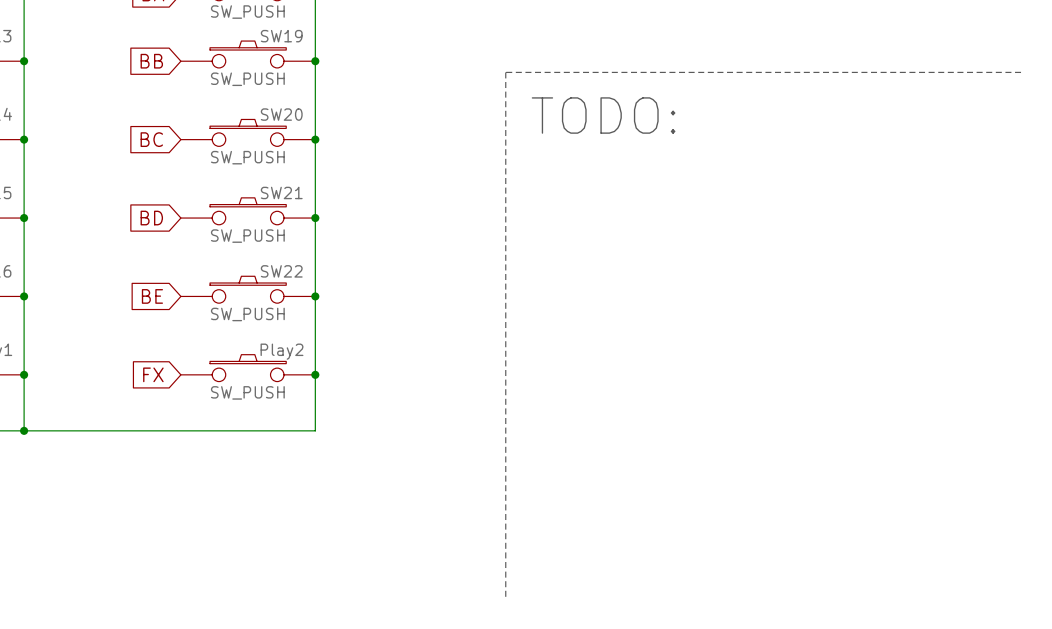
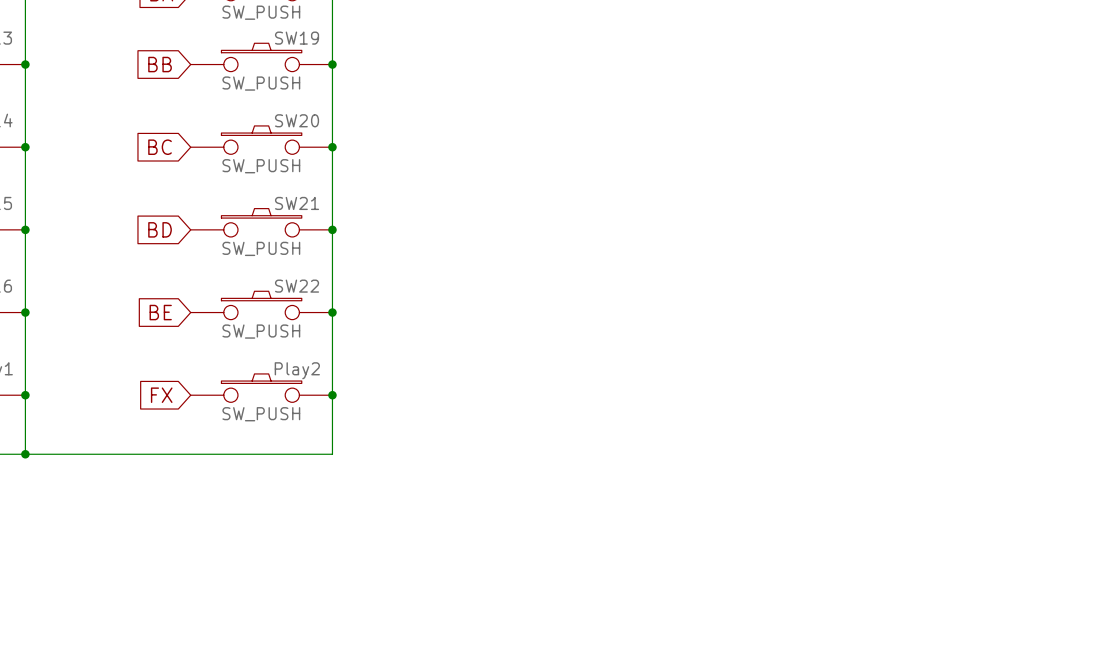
line: (1021, 72) (505, 72) (505, 598) -> none
text: TODO: (603, 115) -> none

